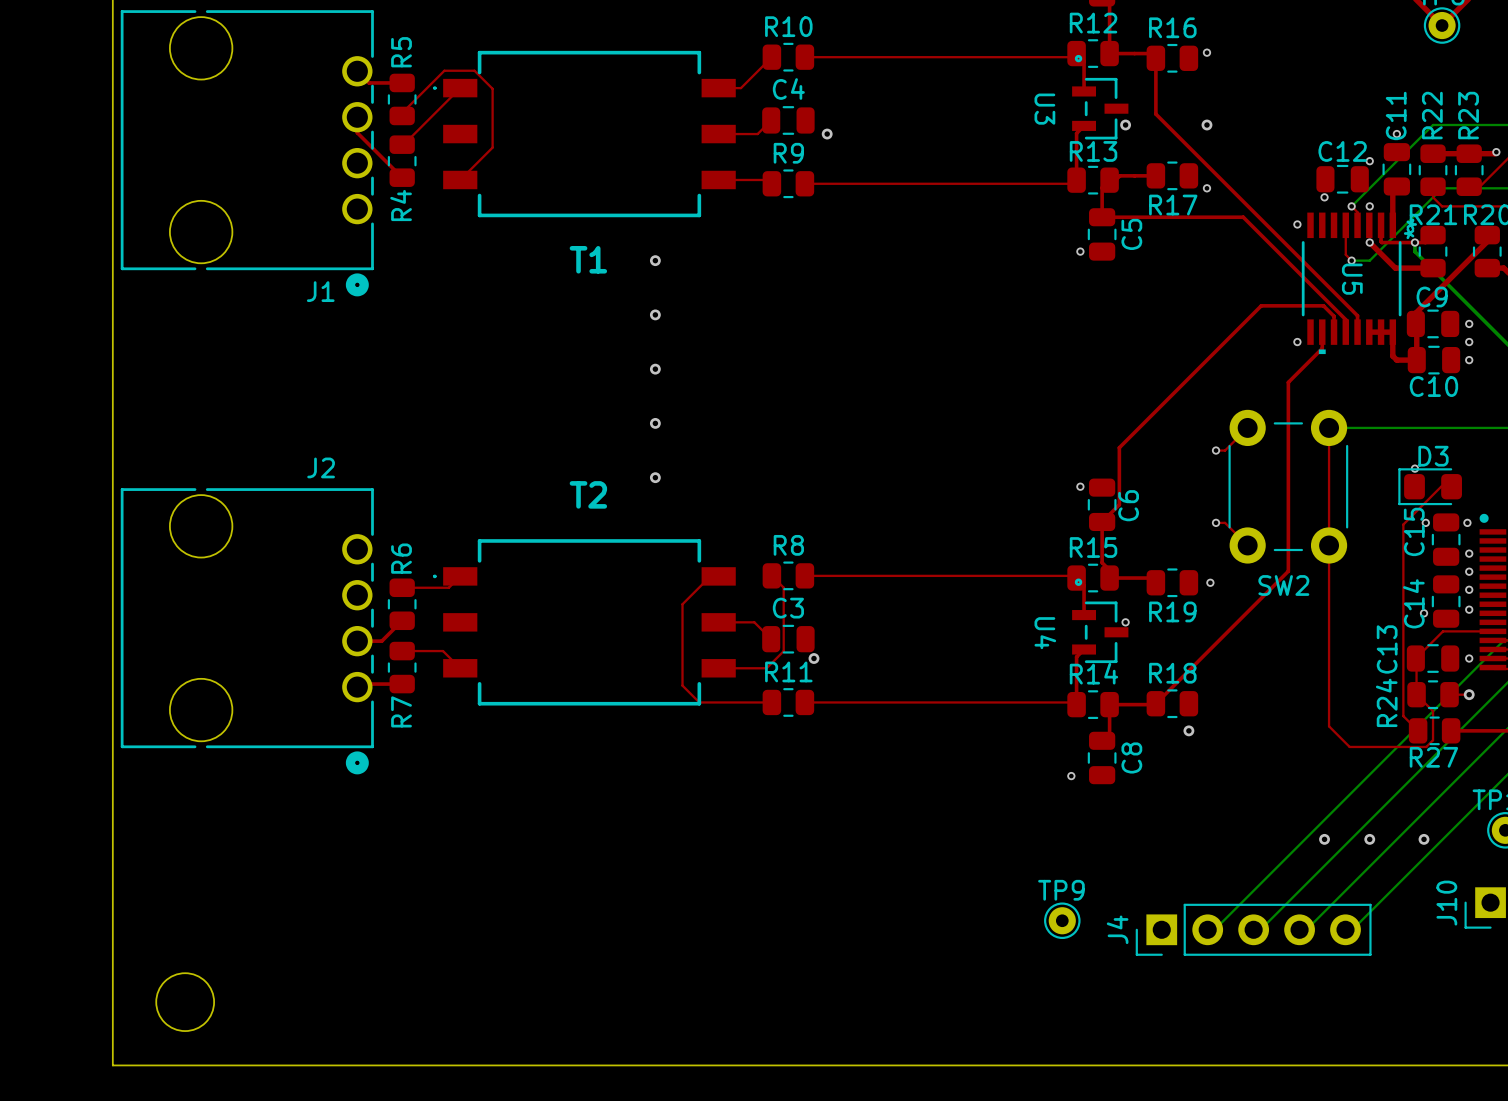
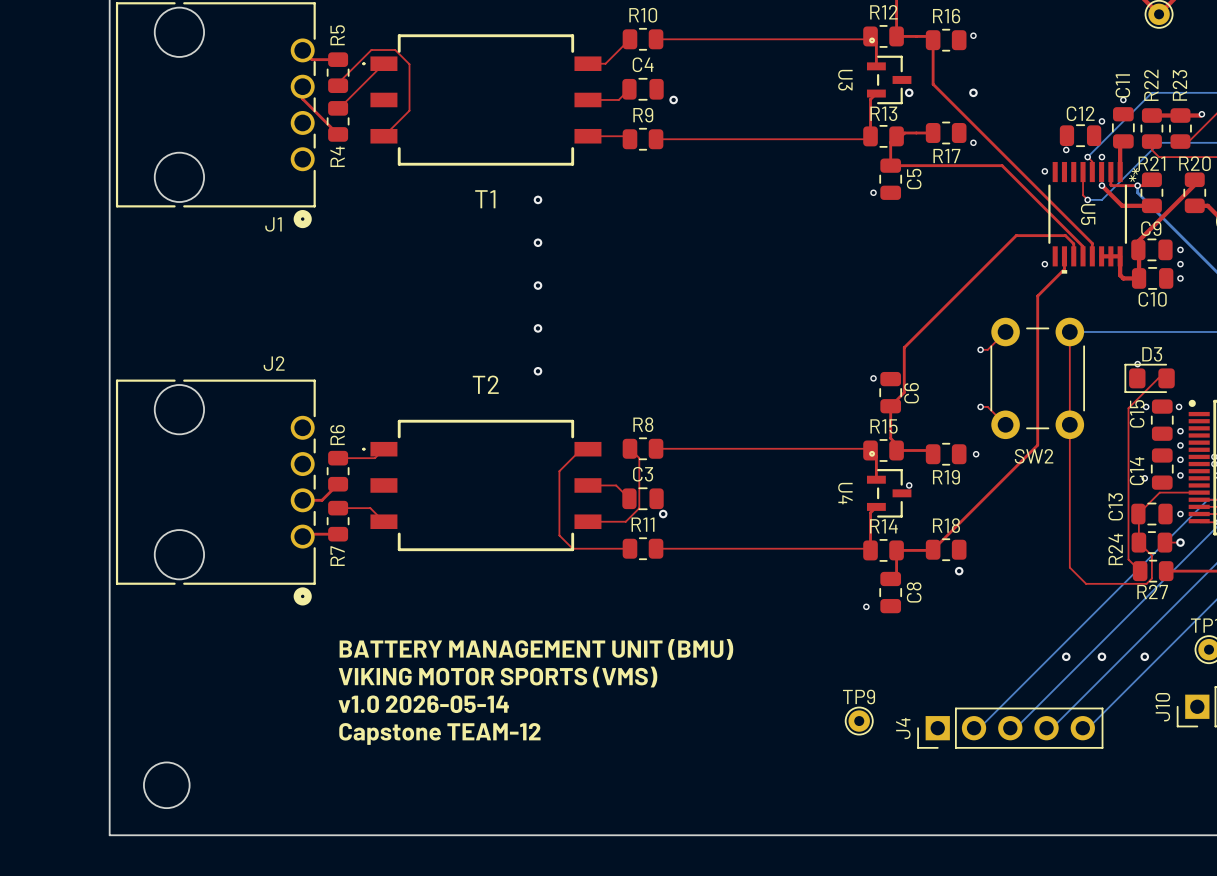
text: none -> BATTERY MANAGEMENT UNIT (BMU) (536, 649)
text: none -> VIKING MOTOR SPORTS (VMS) (498, 677)
text: none -> v1.0 2026-05-14 (423, 704)
text: none -> Capstone TEAM-12 (439, 733)

